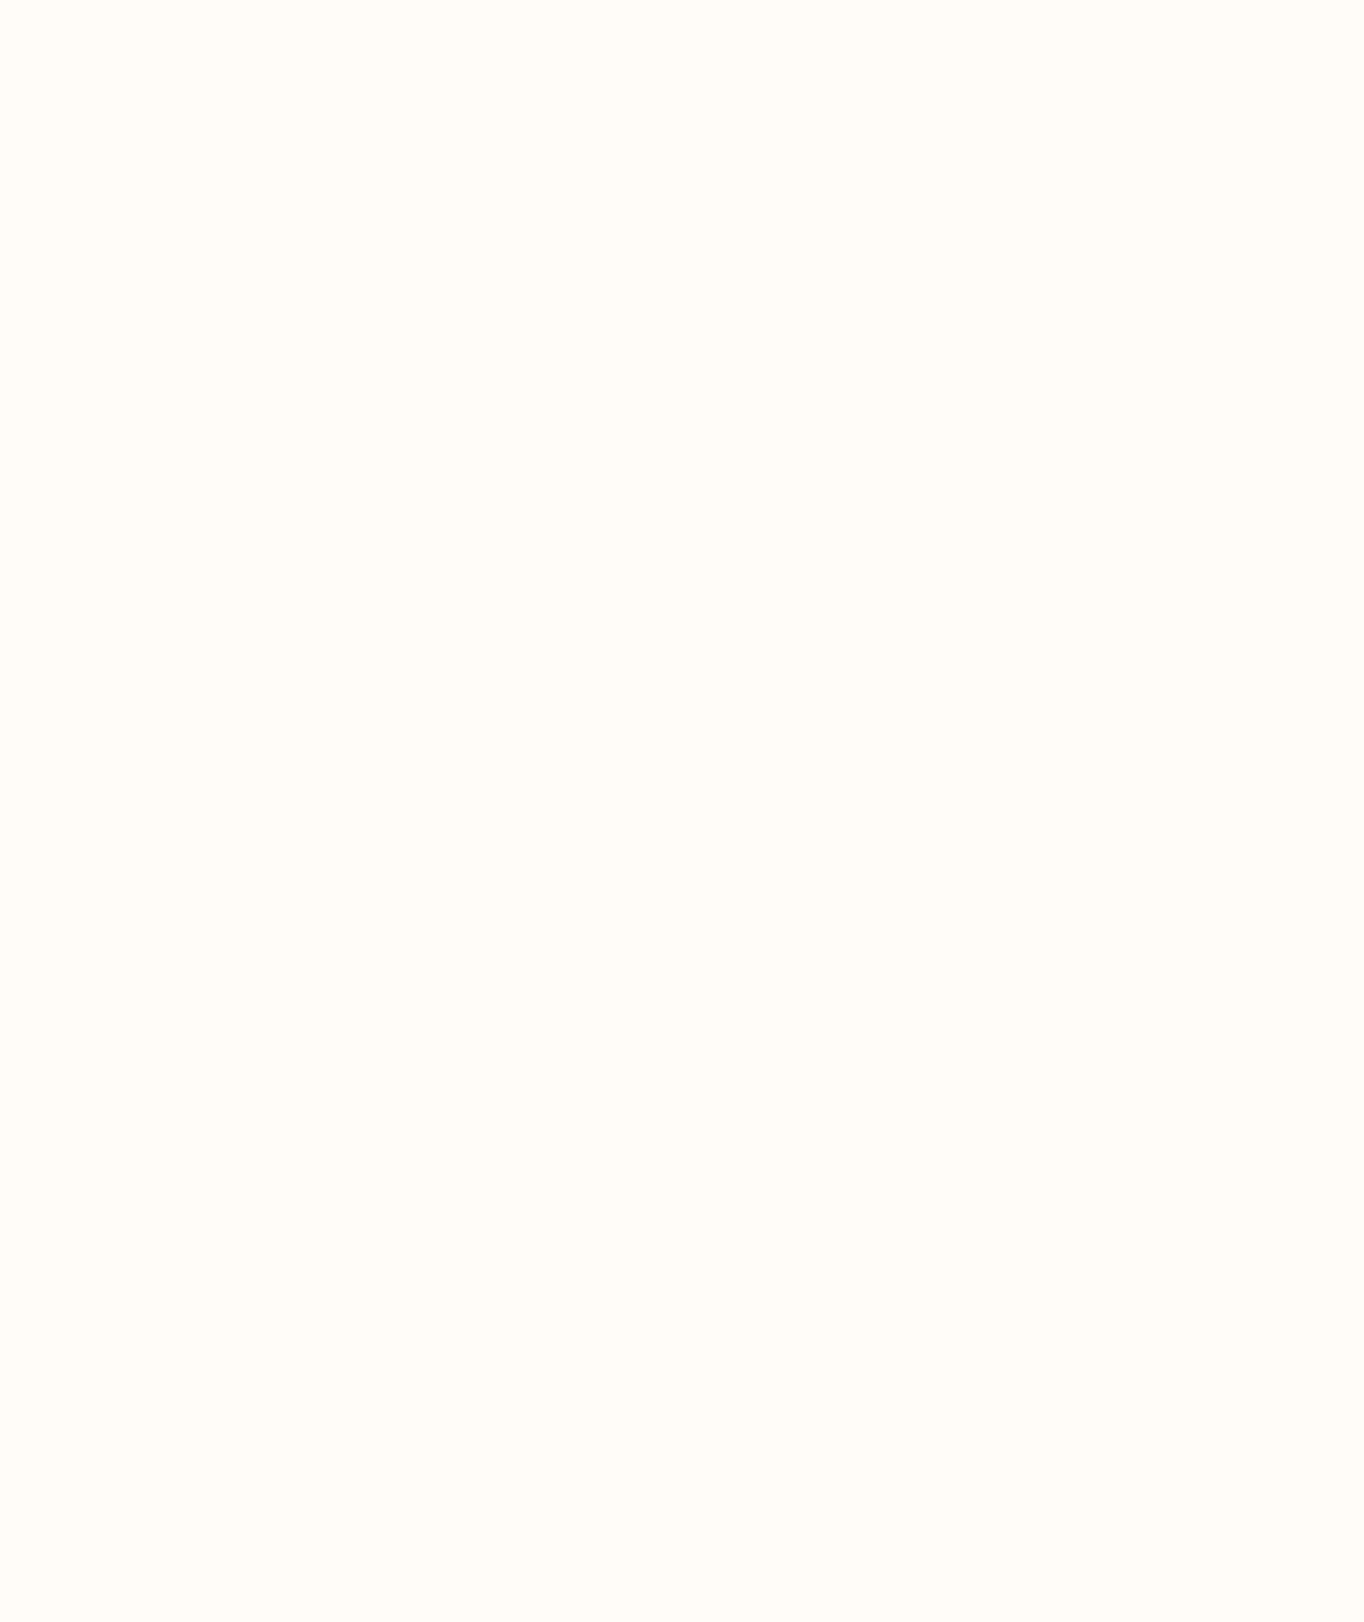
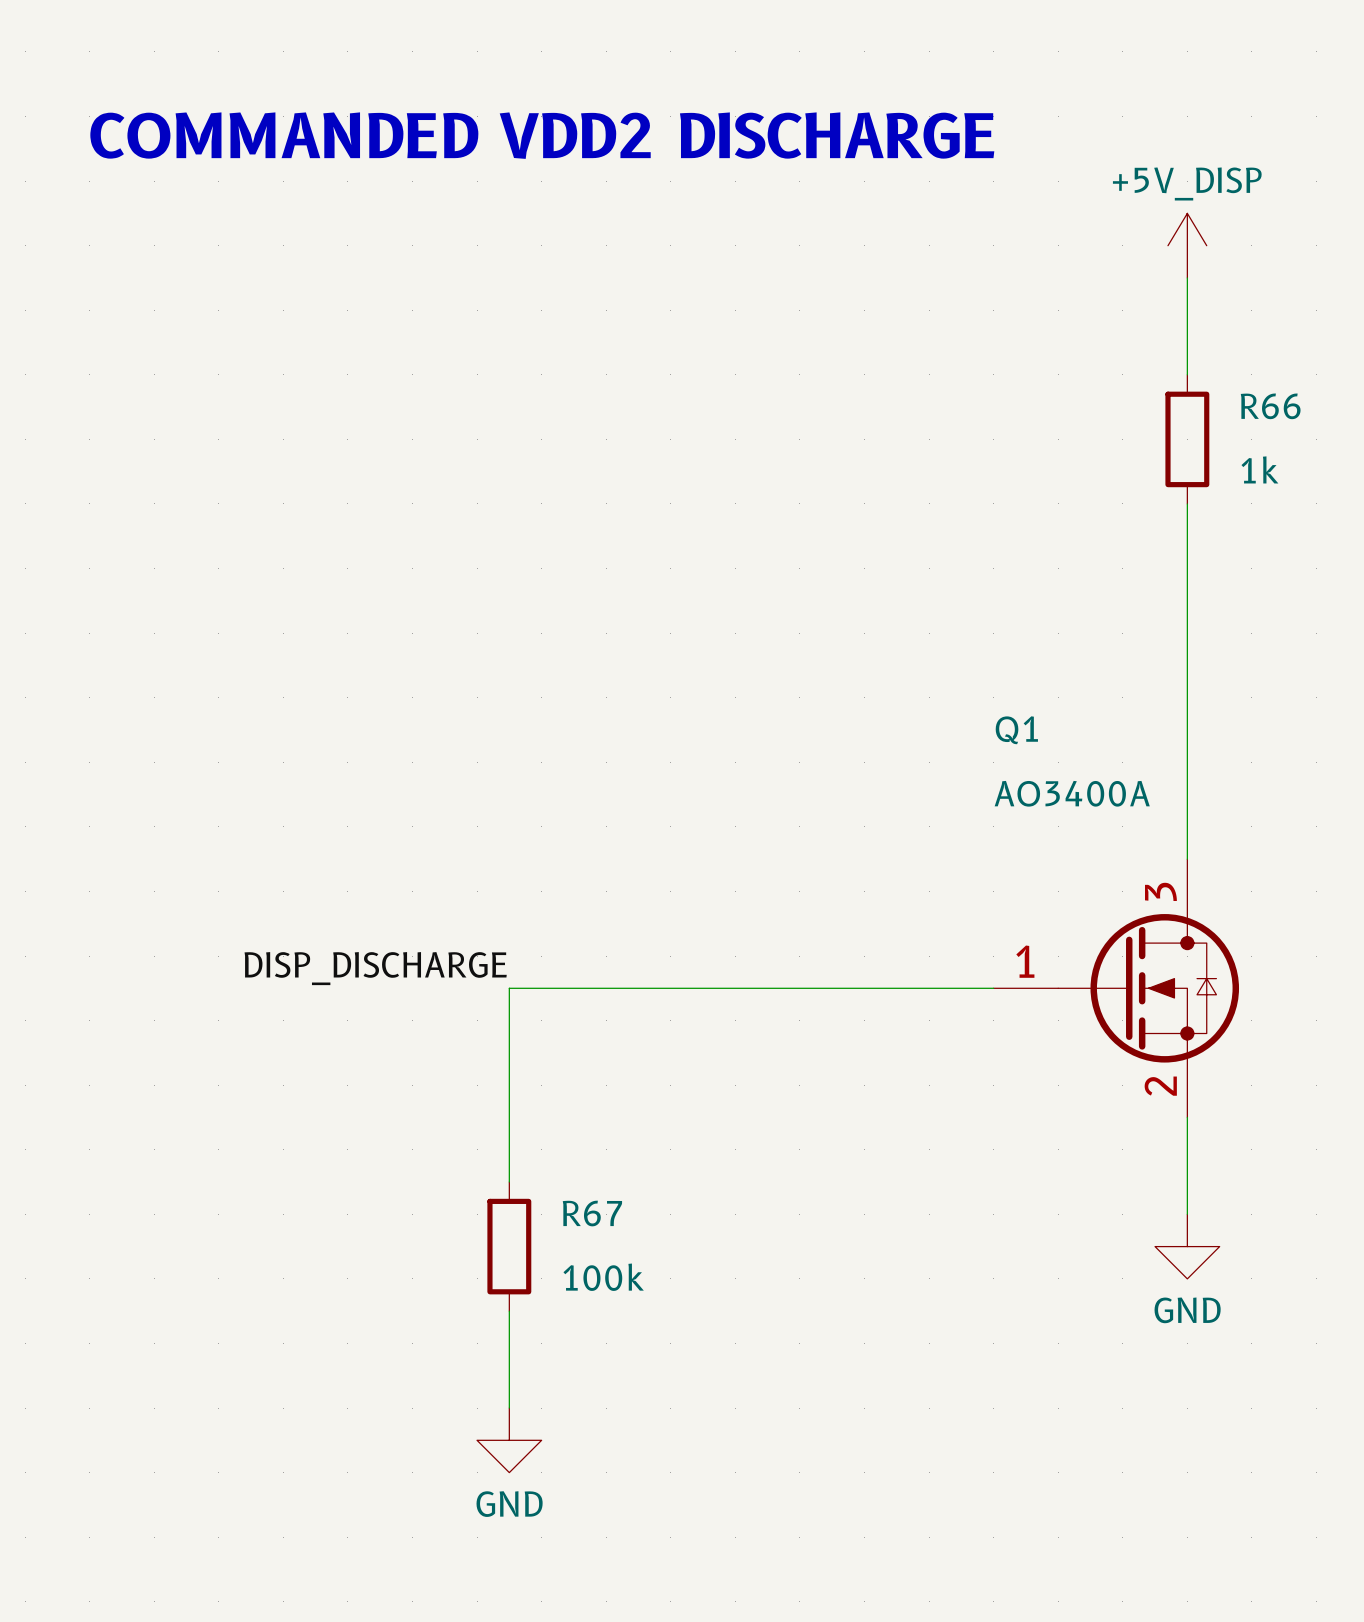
text: none -> COMMANDED VDD2 DISCHARGE (542, 135)
power symbol: none -> +5V_DISP (1187, 245)
wire: none -> (1187, 277) (1187, 374)
R66: none -> 1k (1187, 439)
wire: none -> (1187, 503) (1187, 859)
label: none -> DISP_DISCHARGE (375, 968)
wire: none -> (993, 988) (509, 988) (509, 1182)
Q1: none -> AO3400A (1116, 988)
wire: none -> (1187, 1117) (1187, 1214)
R67: none -> 100k (509, 1246)
power symbol: none -> GND (1187, 1246)
wire: none -> (509, 1311) (509, 1408)
power symbol: none -> GND (509, 1440)

